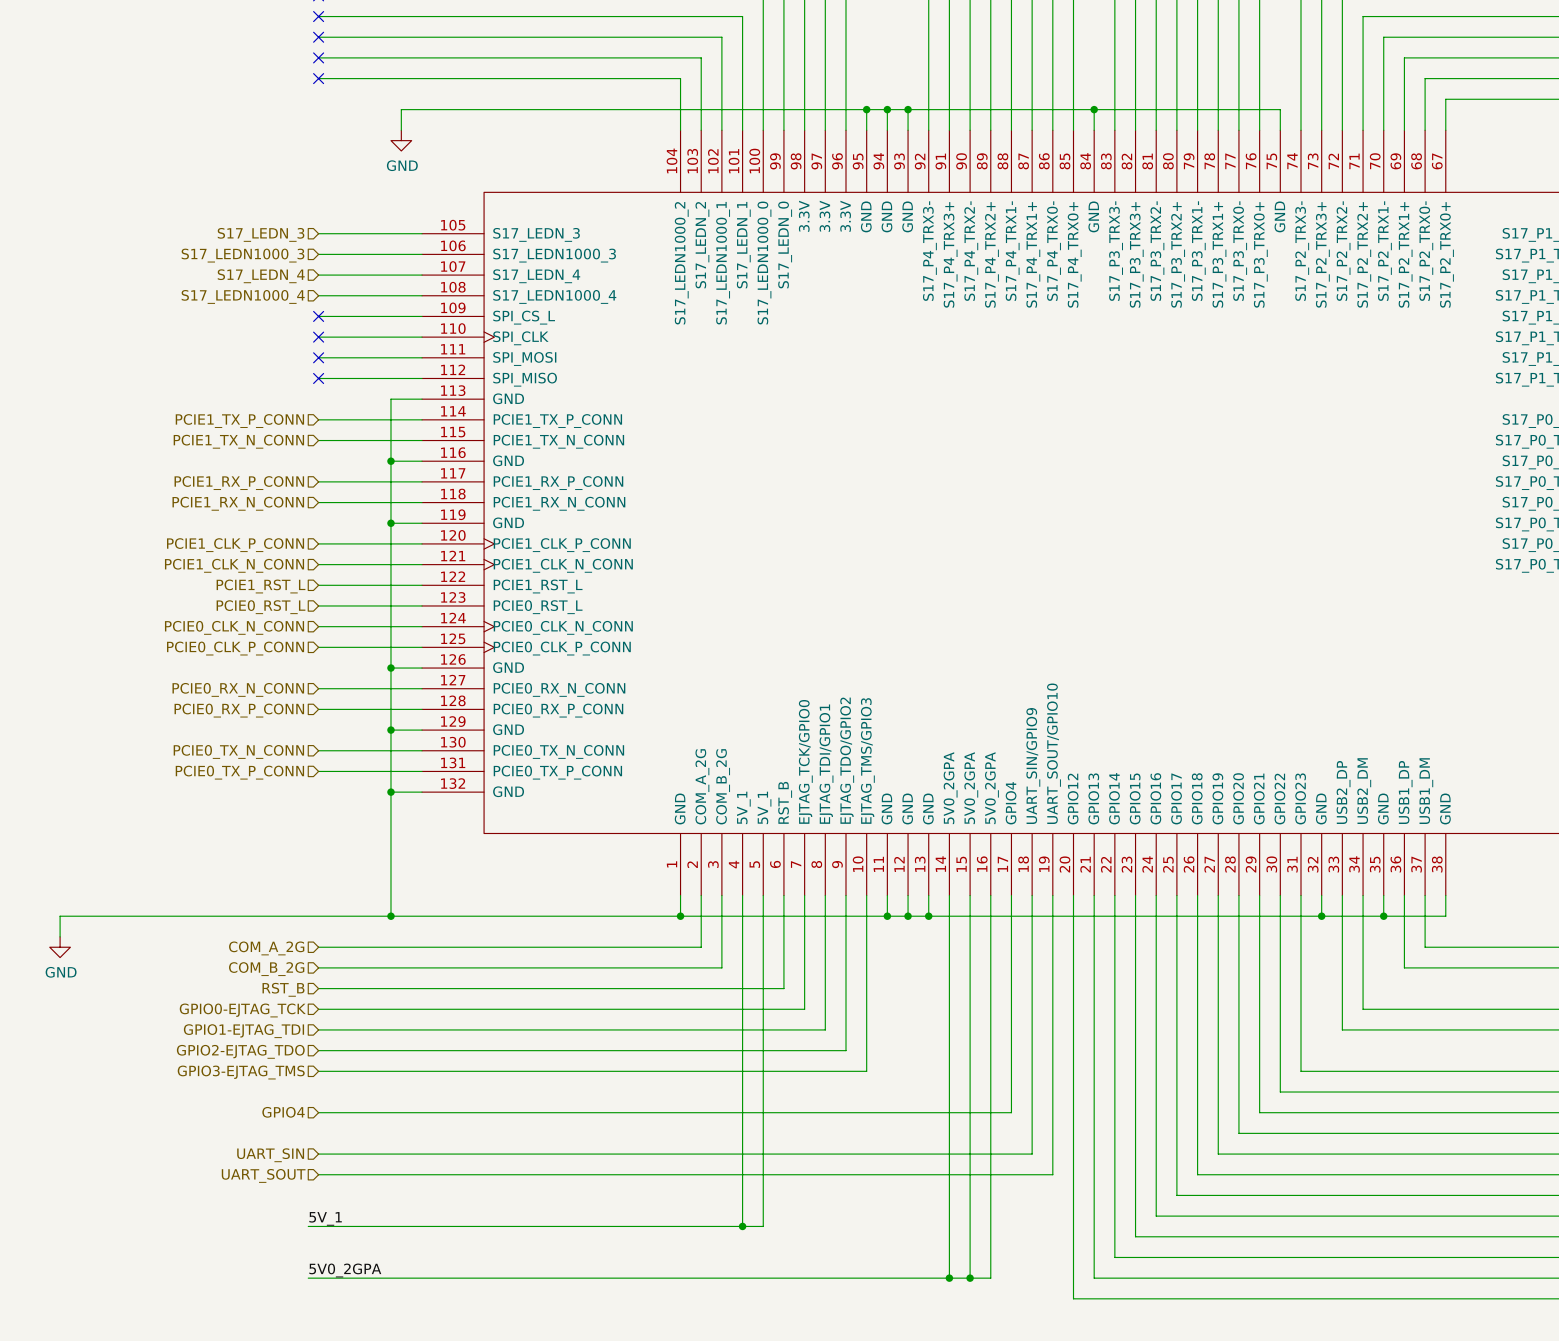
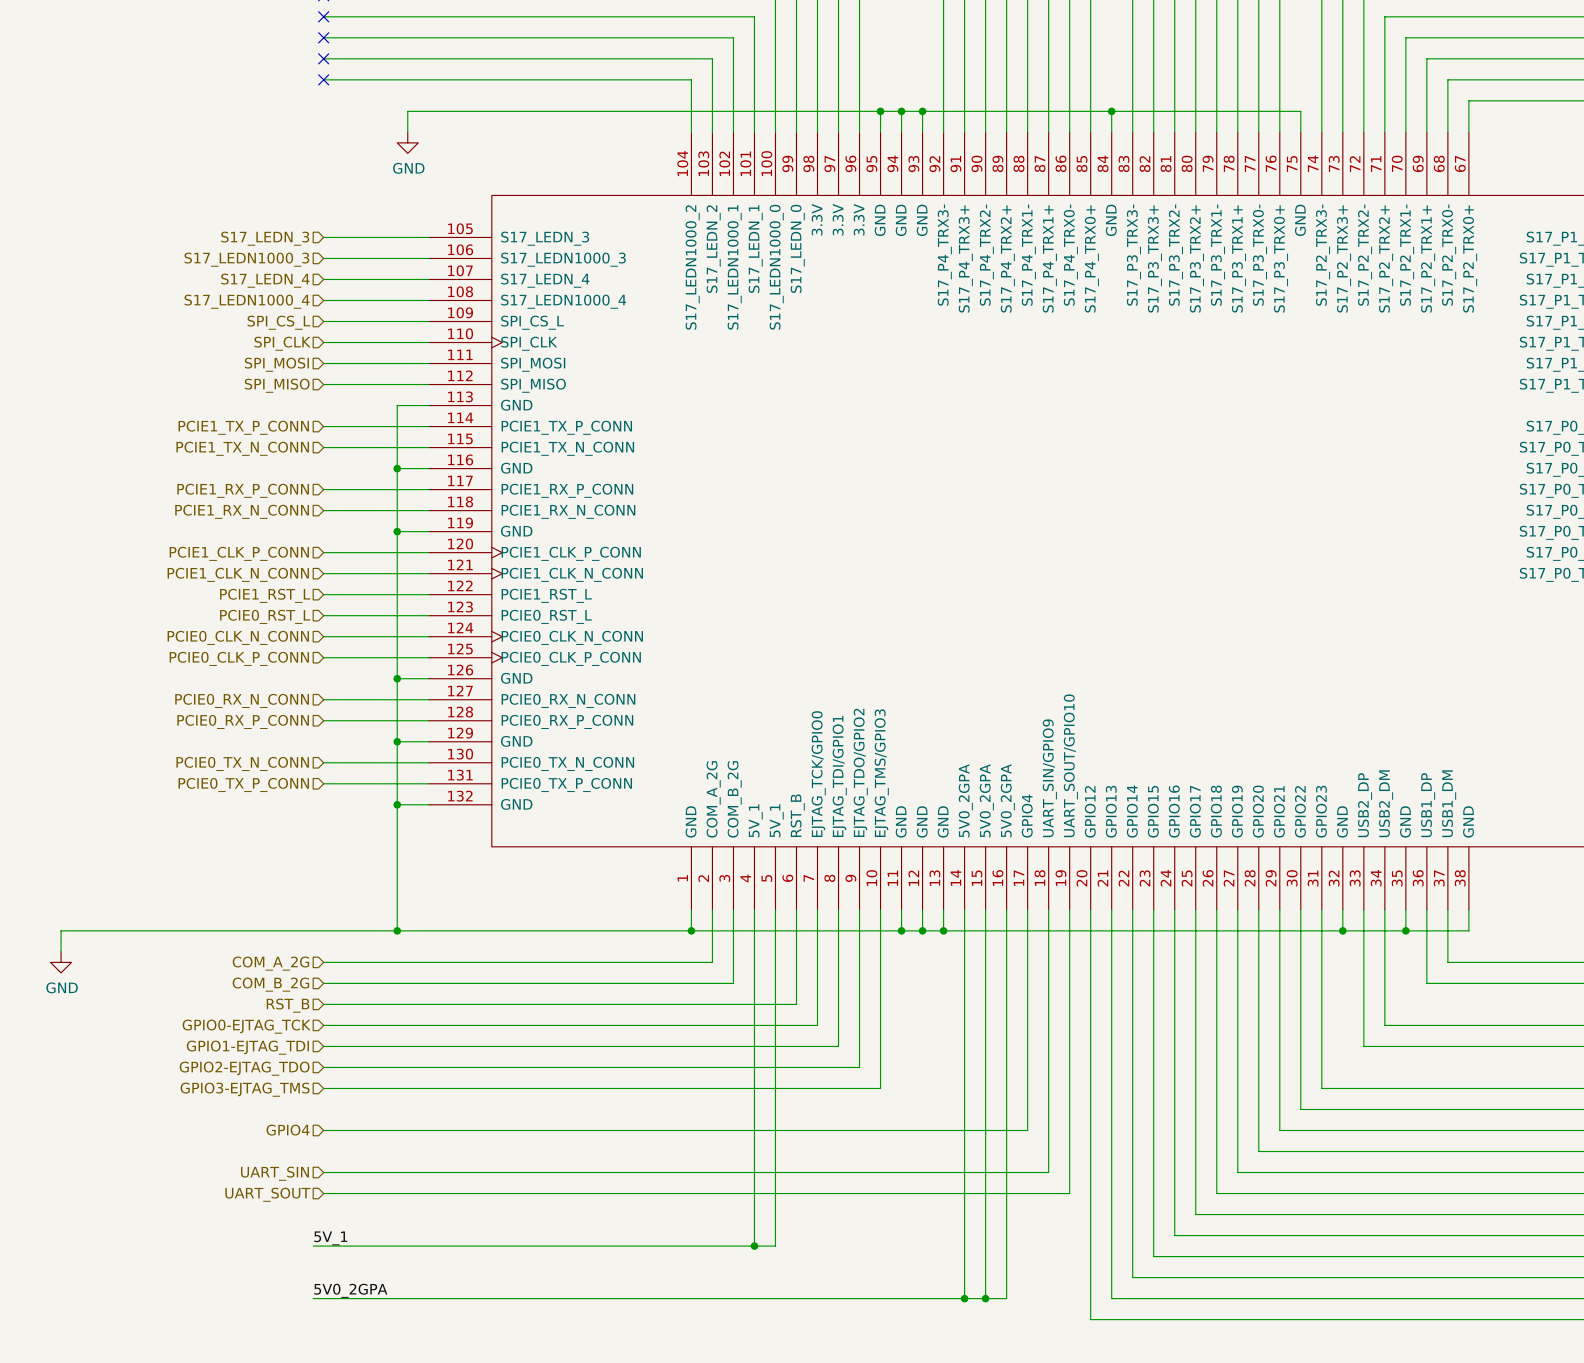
no-connect mark: (318, 316) -> none
hierarchical label: none -> SPI_CS_L (278, 322)
no-connect mark: (318, 337) -> none
hierarchical label: none -> SPI_CLK (282, 343)
no-connect mark: (318, 357) -> none
hierarchical label: none -> SPI_MOSI (276, 364)
no-connect mark: (318, 378) -> none
hierarchical label: none -> SPI_MISO (277, 385)

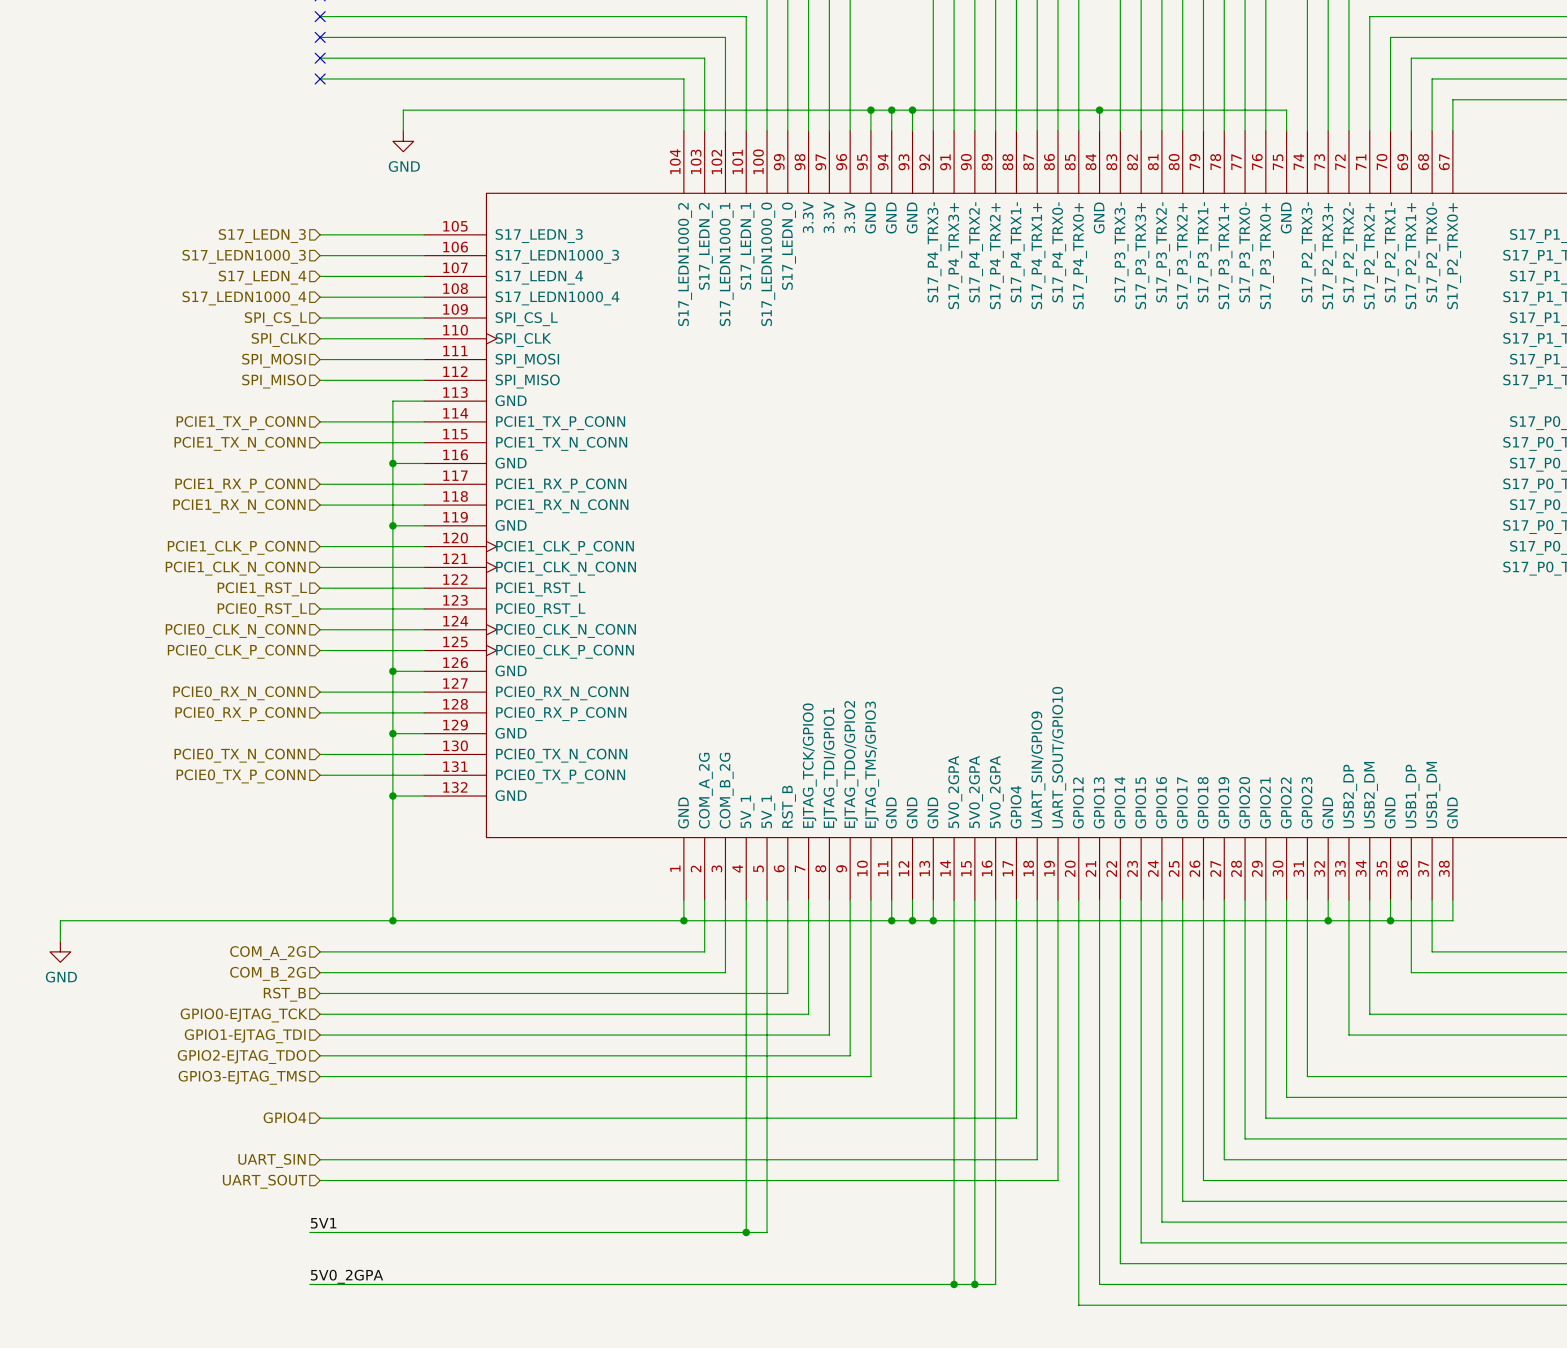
label: 5V_1 (330, 1238) -> 5V1 (323, 1223)

